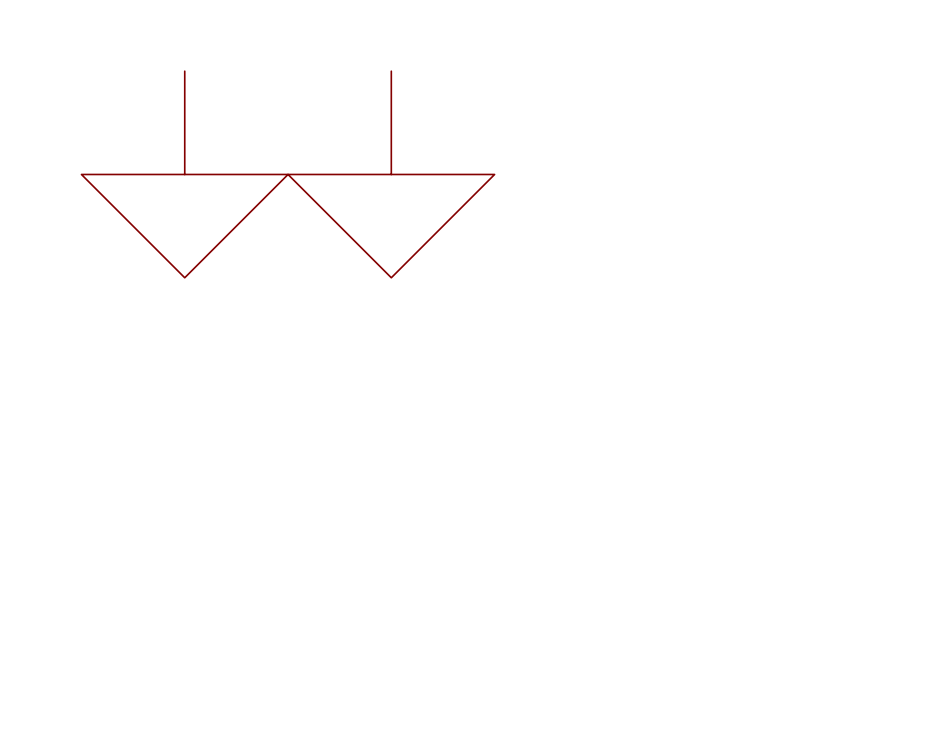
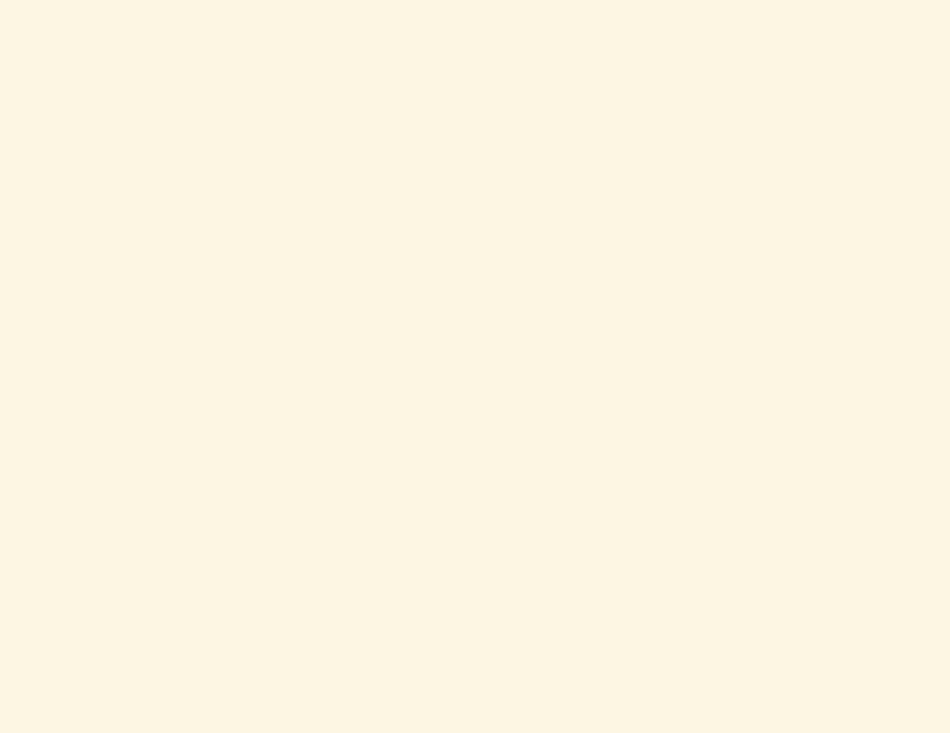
power symbol: (184, 174) -> none
power symbol: (391, 174) -> none

